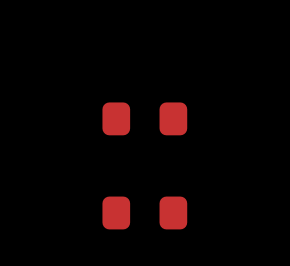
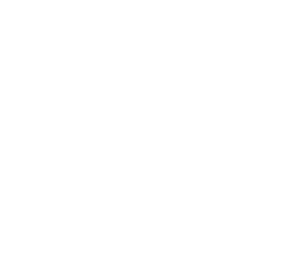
part: (144, 118) -> none
part: (144, 212) -> none

